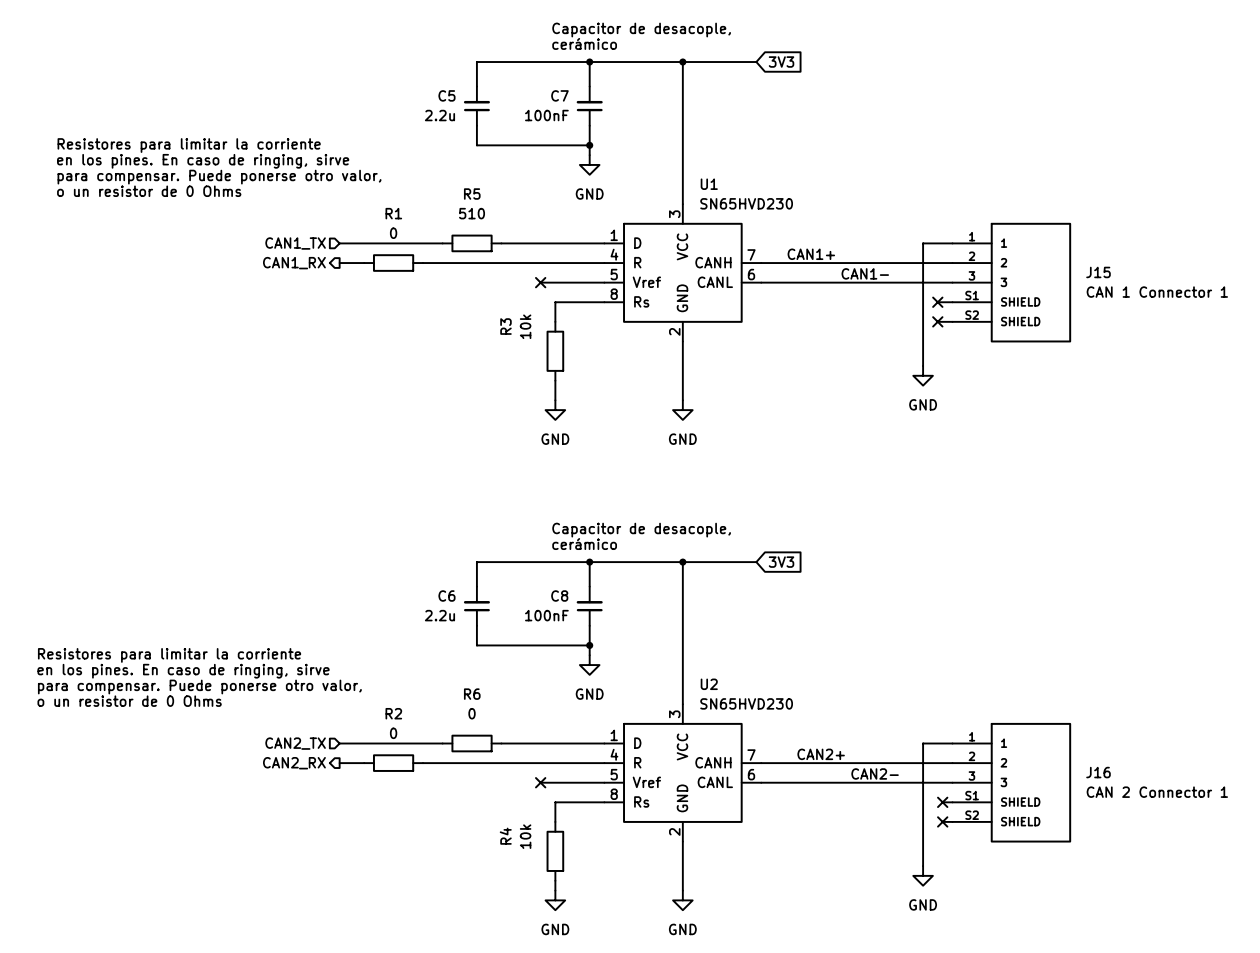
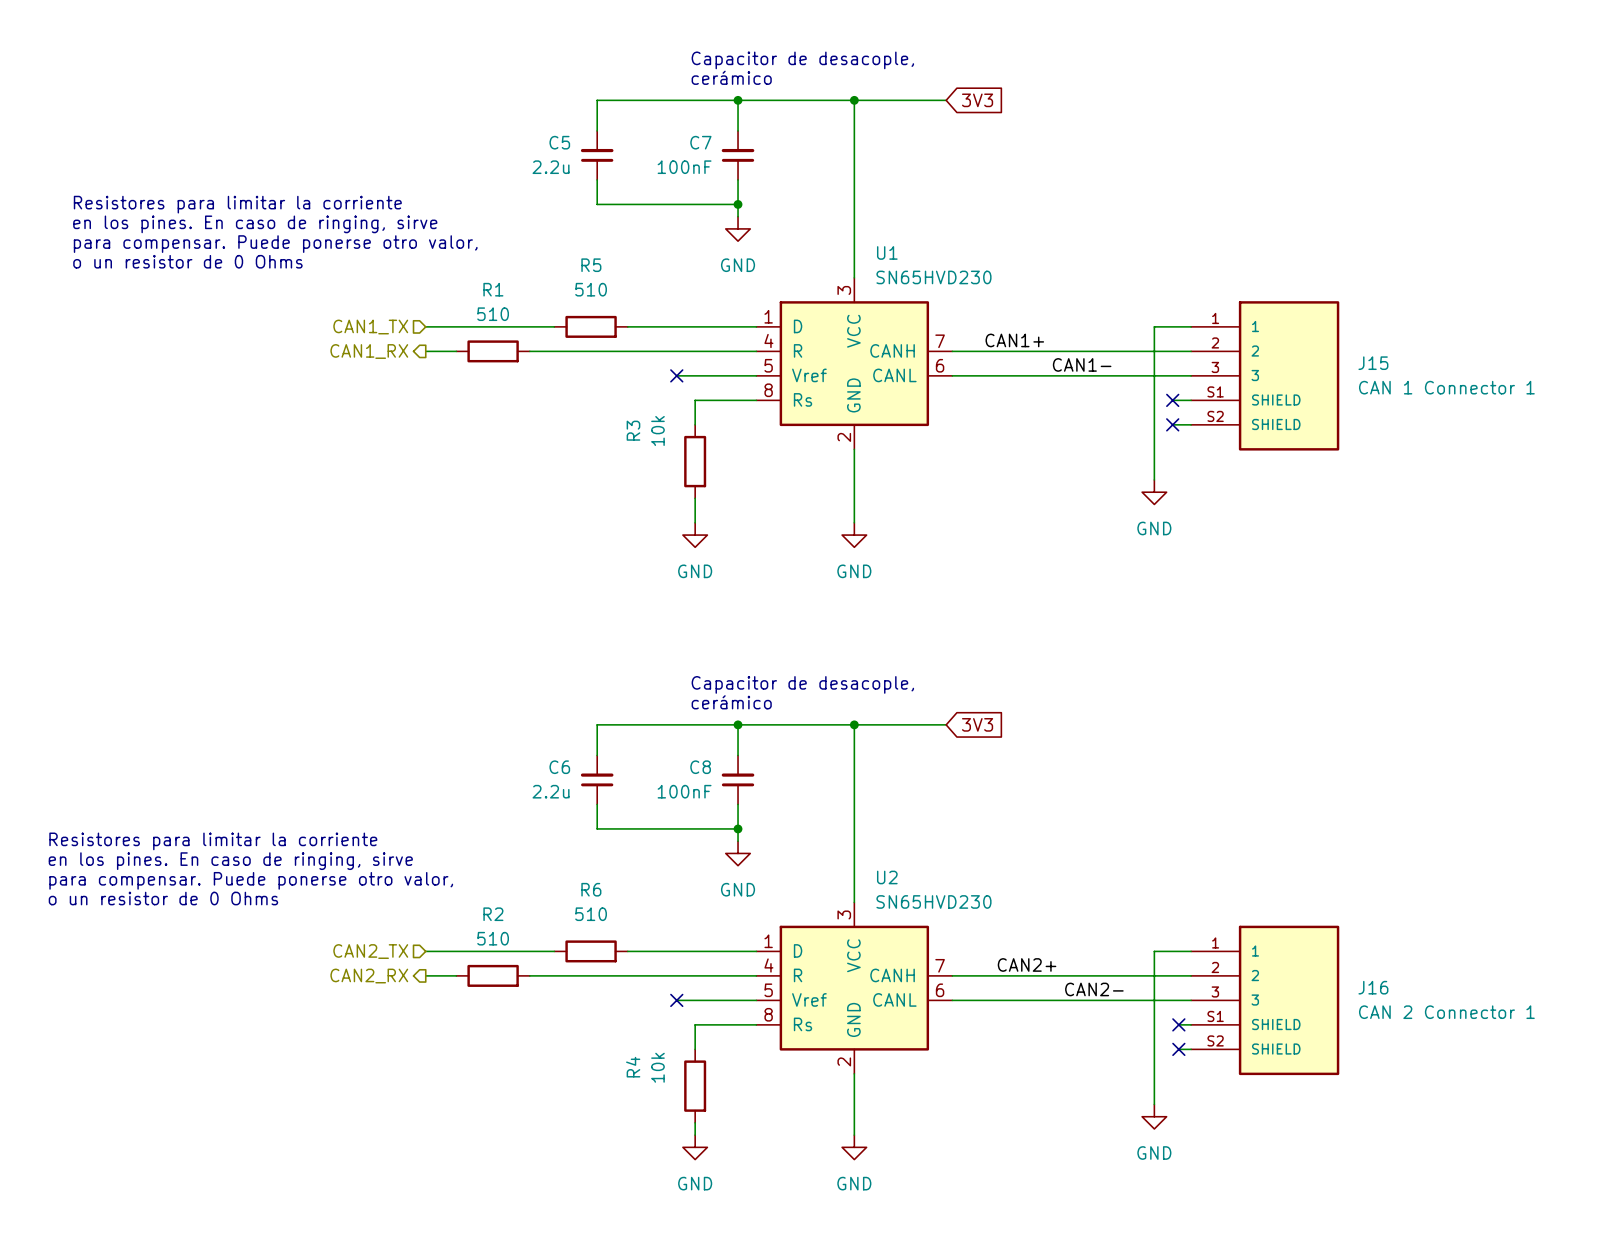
R1 value: 0 (393, 233) -> 510 (493, 314)
R6 value: 0 (472, 713) -> 510 (591, 914)
R2 value: 0 (393, 733) -> 510 (493, 938)

